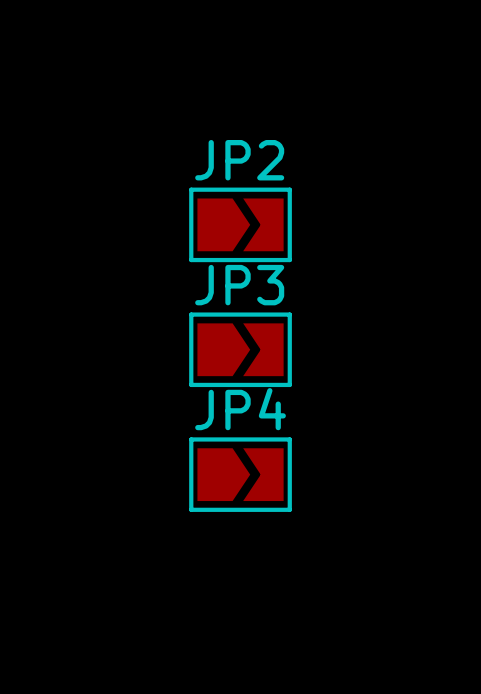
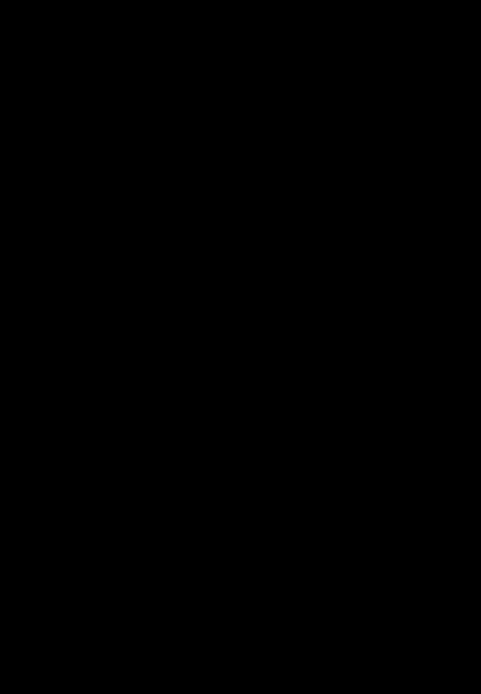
JP2: (240, 224) -> none
JP3: (240, 349) -> none
JP4: (240, 474) -> none

